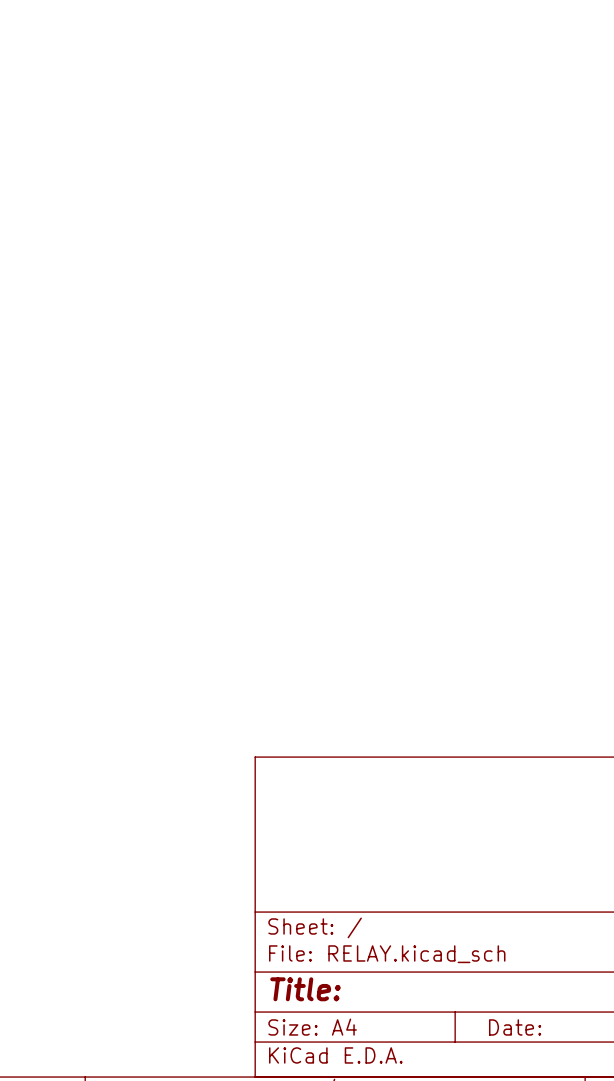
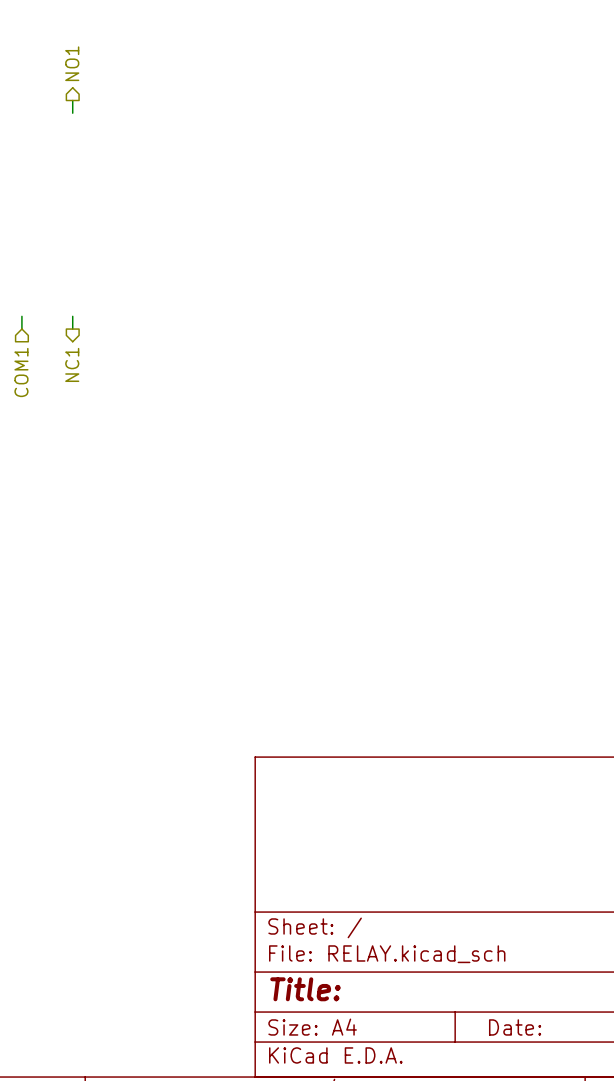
hierarchical label: none -> NO1 (72, 63)
wire: none -> (72, 100) (72, 113)
wire: none -> (21, 316) (21, 329)
wire: none -> (72, 316) (72, 329)
hierarchical label: none -> NC1 (72, 364)
hierarchical label: none -> COM1 (21, 372)

